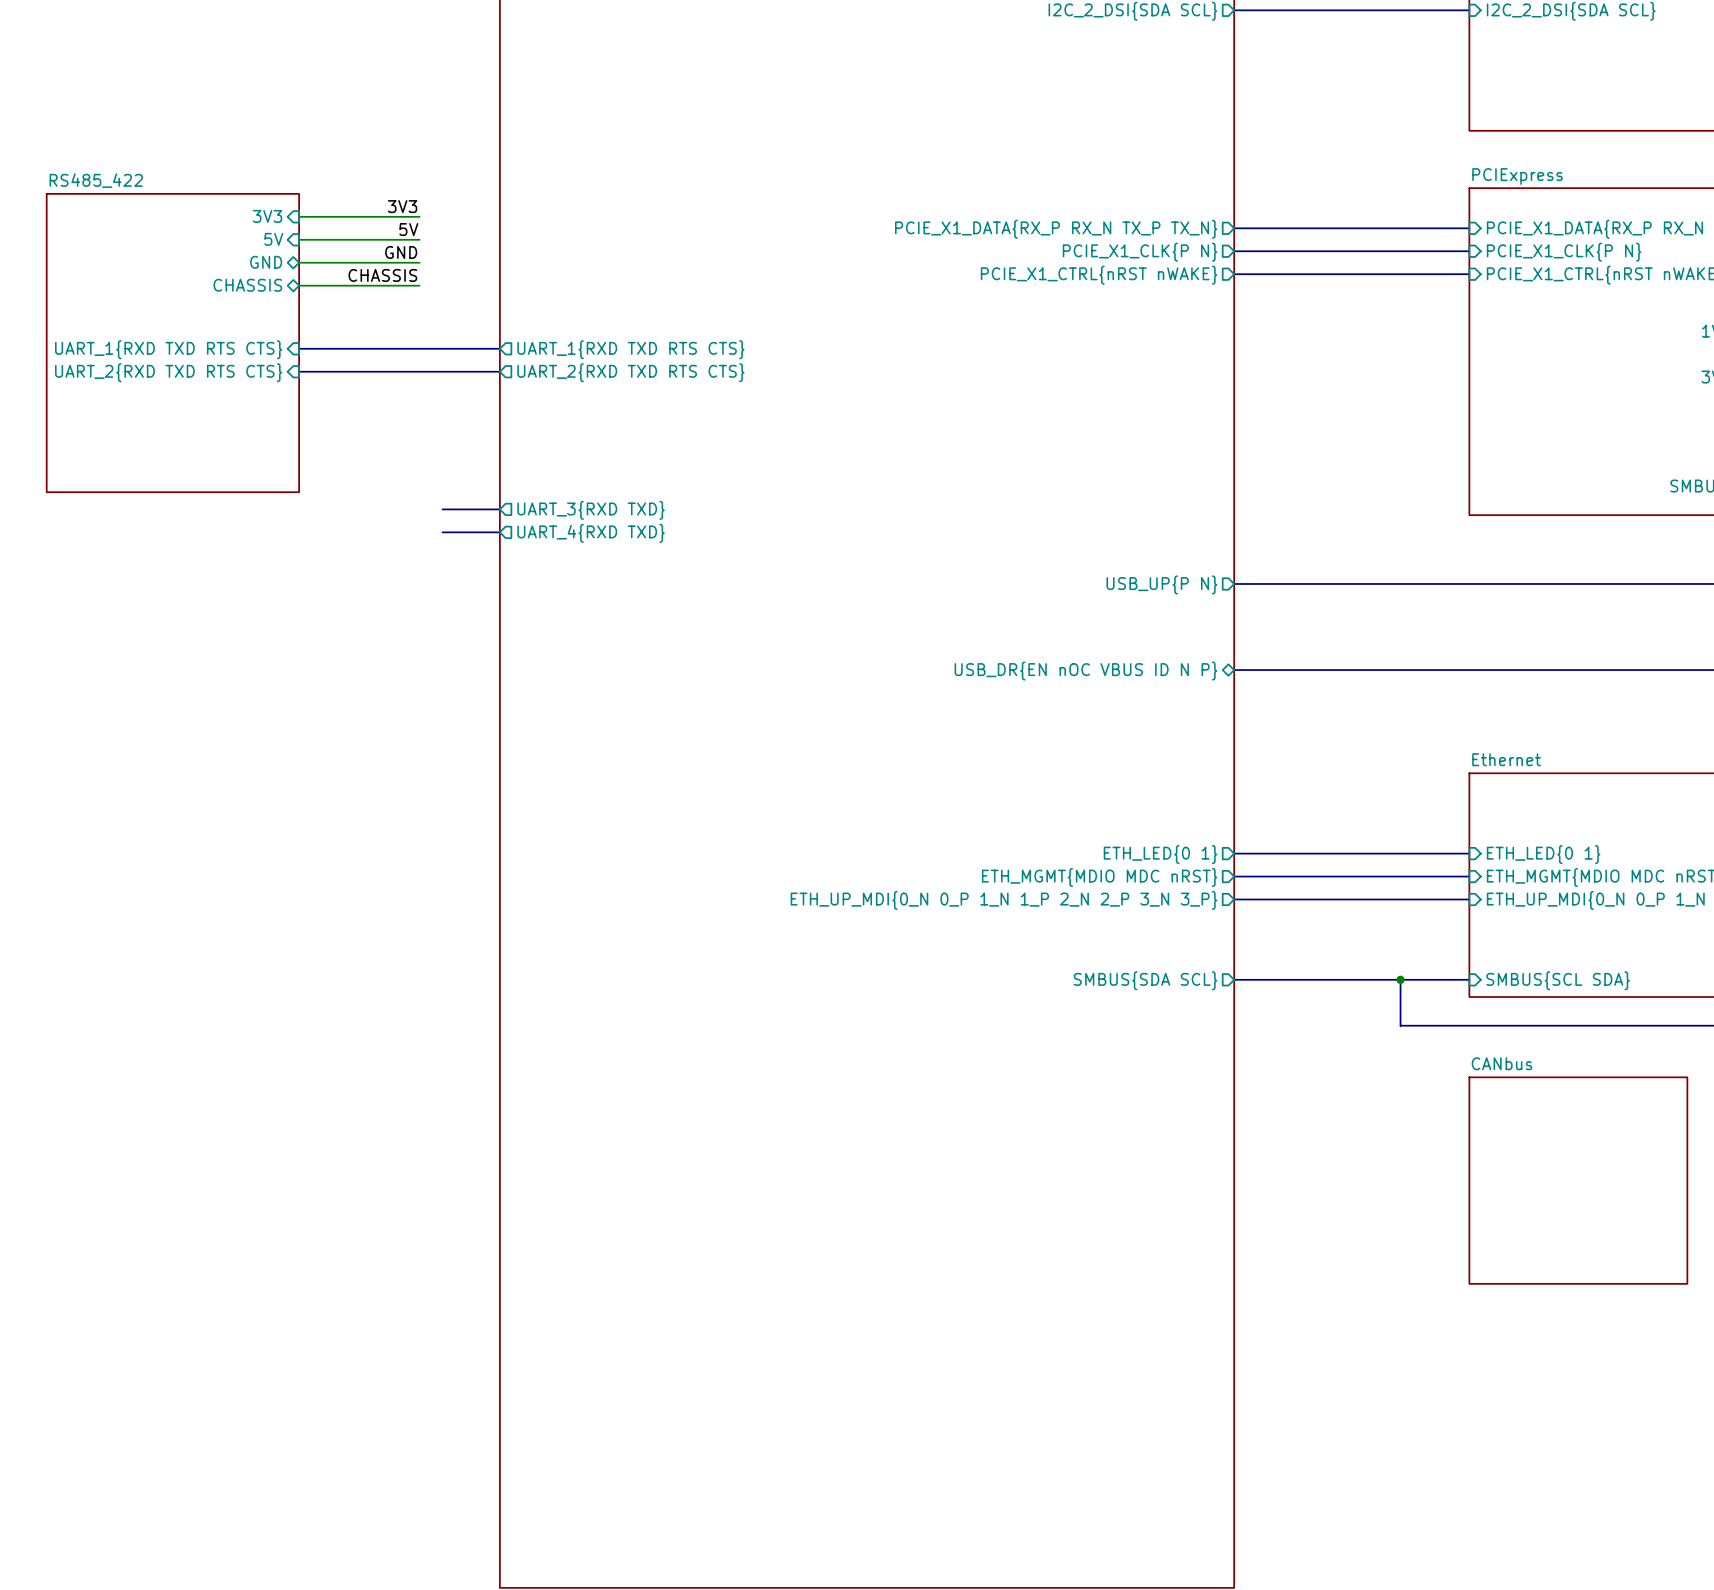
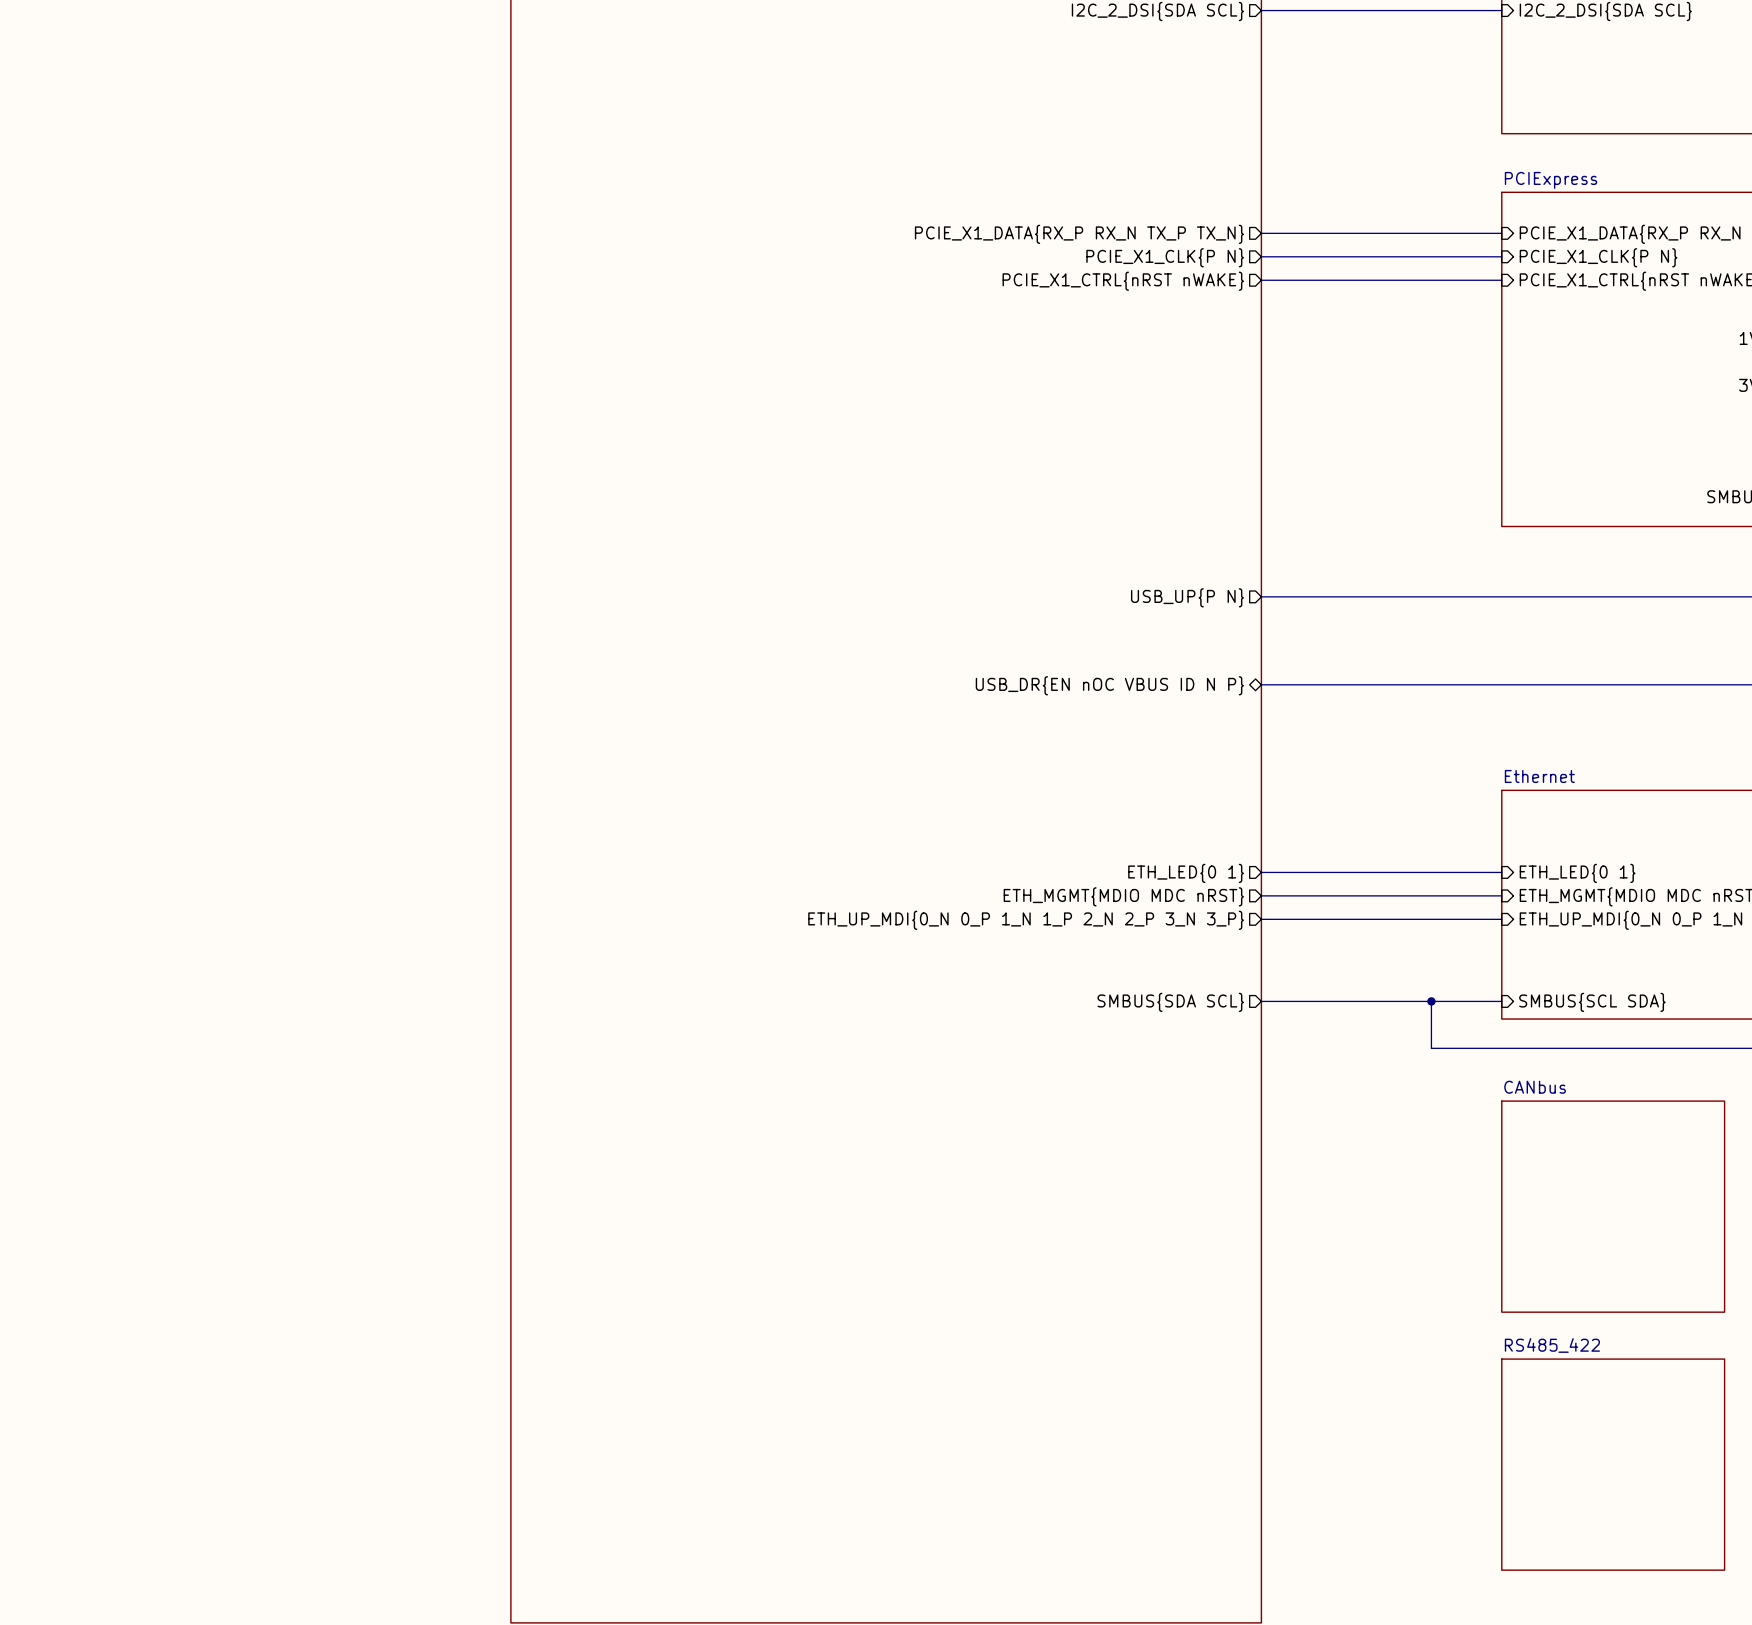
sheet RS485_422 name position: RS485_422 (96, 180) -> RS485_422 (1552, 1345)
sheet RS485_422 shape: [46, 193, 300, 493] -> [1501, 1358, 1726, 1571]
label: 3V3 (402, 206) -> none
sheet pin: 3V3 (267, 216) -> none
wire: (299, 216) (419, 216) -> none
label: 5V (408, 229) -> none
sheet pin: 5V (273, 239) -> none
wire: (299, 239) (419, 239) -> none
label: GND (401, 252) -> none
sheet pin: GND (266, 262) -> none
wire: (299, 262) (419, 262) -> none
label: CHASSIS (382, 275) -> none
sheet pin: CHASSIS (247, 285) -> none
wire: (299, 285) (419, 285) -> none
bus: (299, 348) (499, 348) -> none
sheet pin: UART_1{RXD TXD RTS CTS} (168, 349) -> none
sheet pin: UART_1{RXD TXD RTS CTS} (630, 349) -> none
bus: (299, 371) (499, 371) -> none
sheet pin: UART_2{RXD TXD RTS CTS} (168, 372) -> none
sheet pin: UART_2{RXD TXD RTS CTS} (630, 372) -> none
bus: (442, 509) (499, 509) -> none
sheet pin: UART_3{RXD TXD} (591, 510) -> none
bus: (442, 532) (499, 532) -> none
sheet pin: UART_4{RXD TXD} (591, 533) -> none

